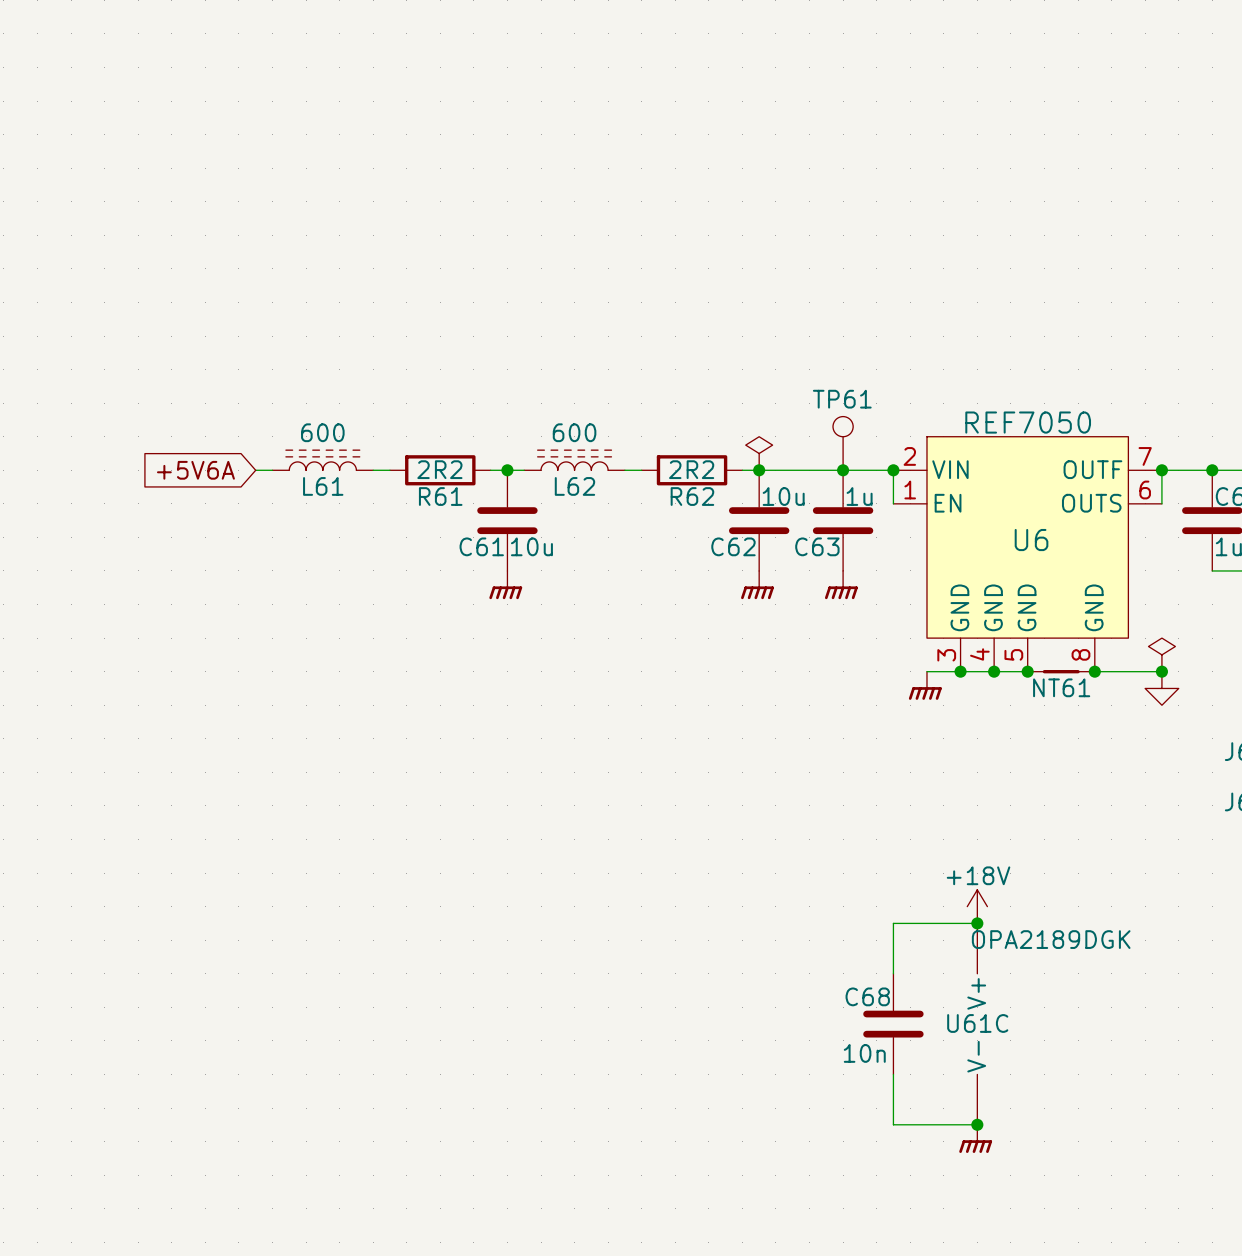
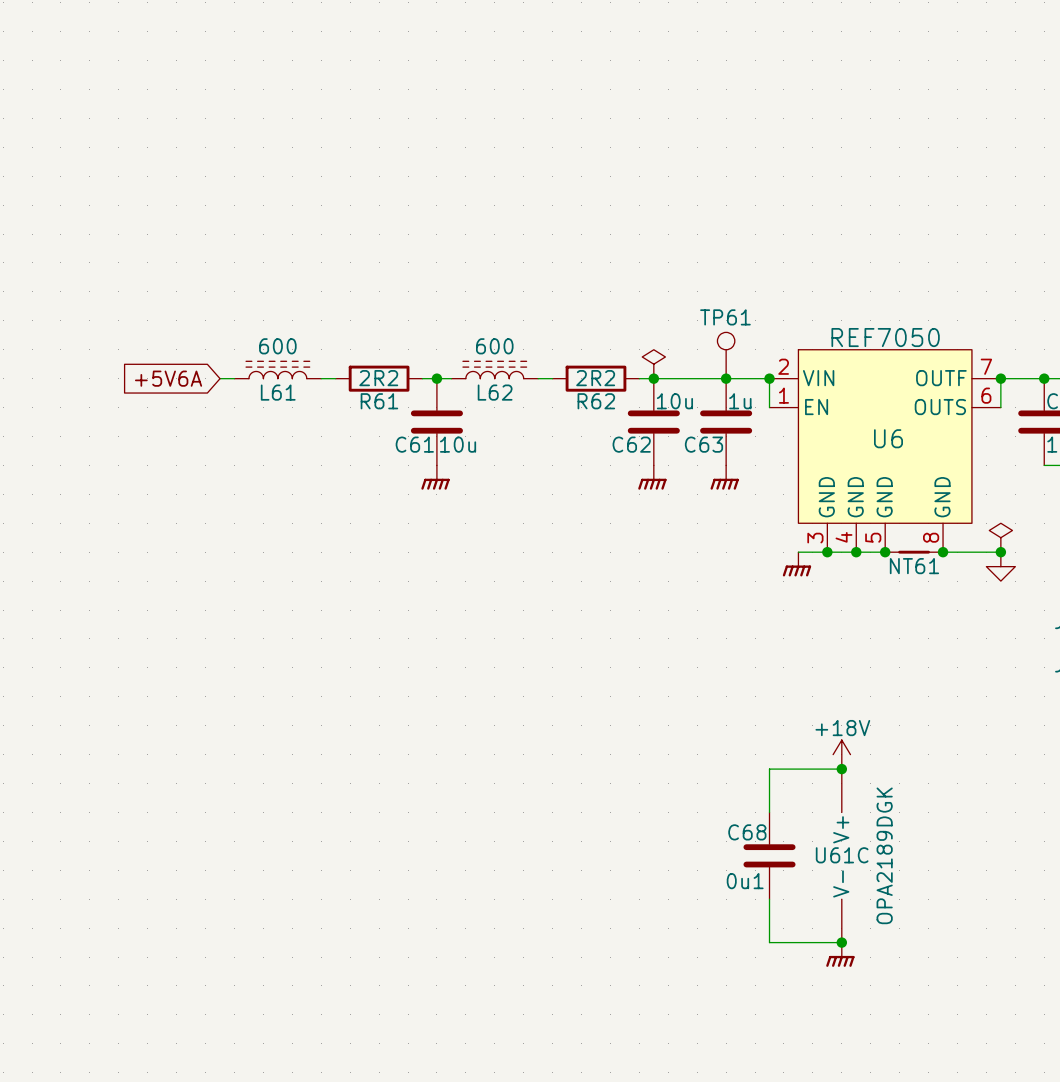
U61C value rotation: 0° (1051, 939) -> 90° counterclockwise (884, 855)
C68 value: 10n (864, 1053) -> 0u1 (745, 881)

